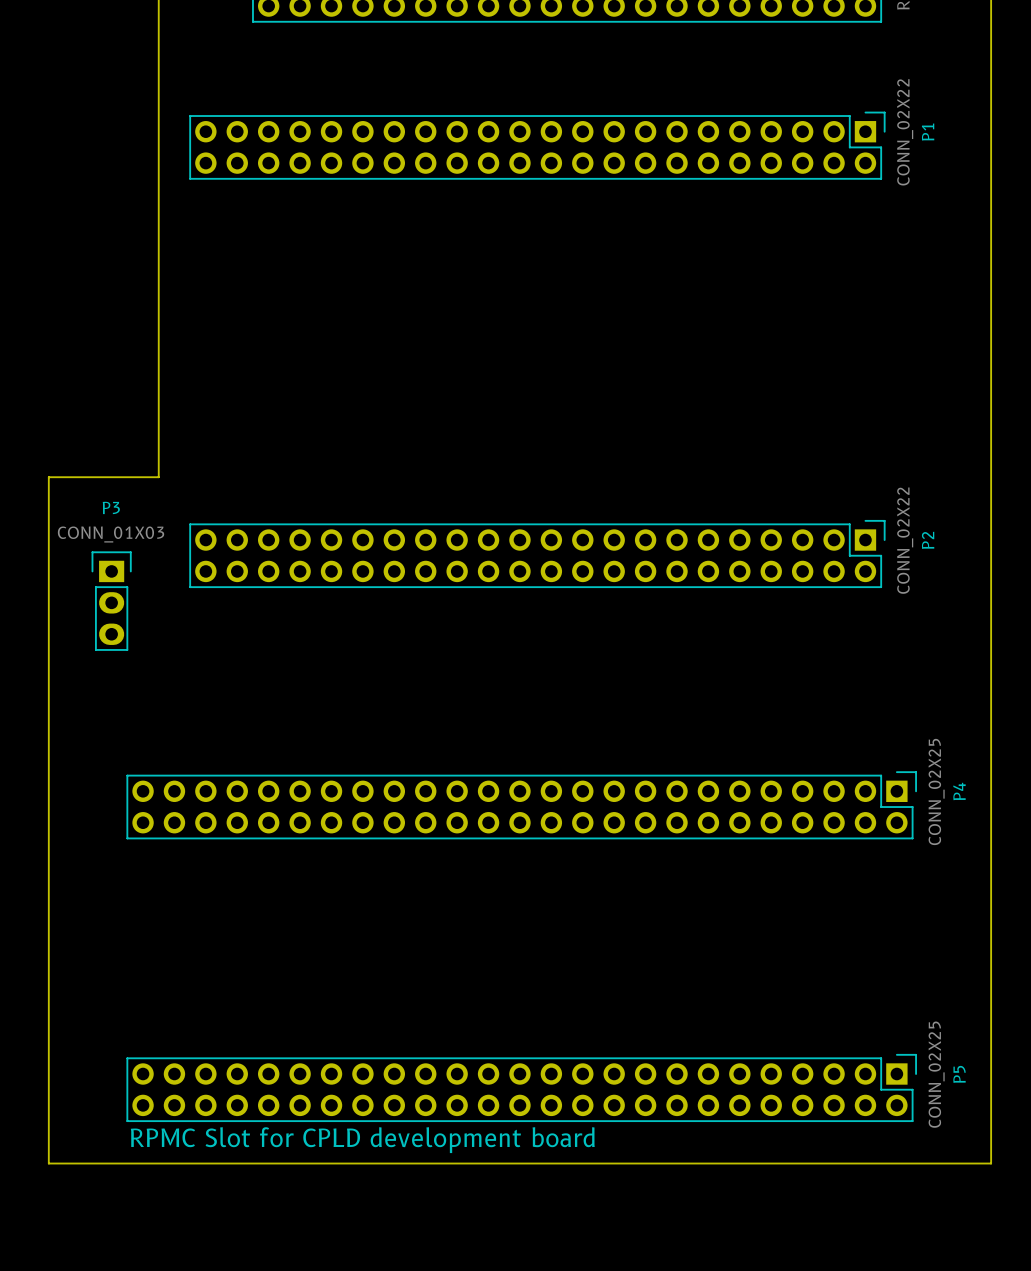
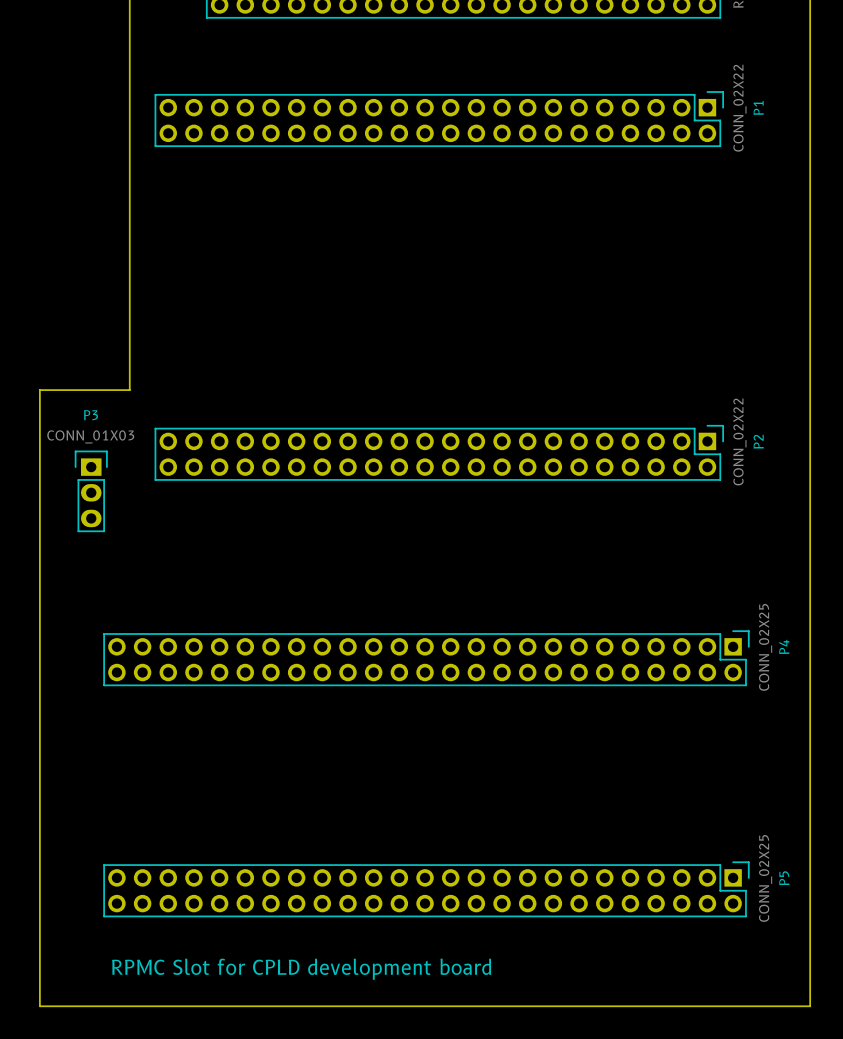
text position: RPMC Slot for CPLD development board (362, 1140) -> RPMC Slot for CPLD development board (301, 969)
board edge: (48, 1163) (991, 1163) -> (39, 951) (39, 1006) (810, 1006) (810, 951)

